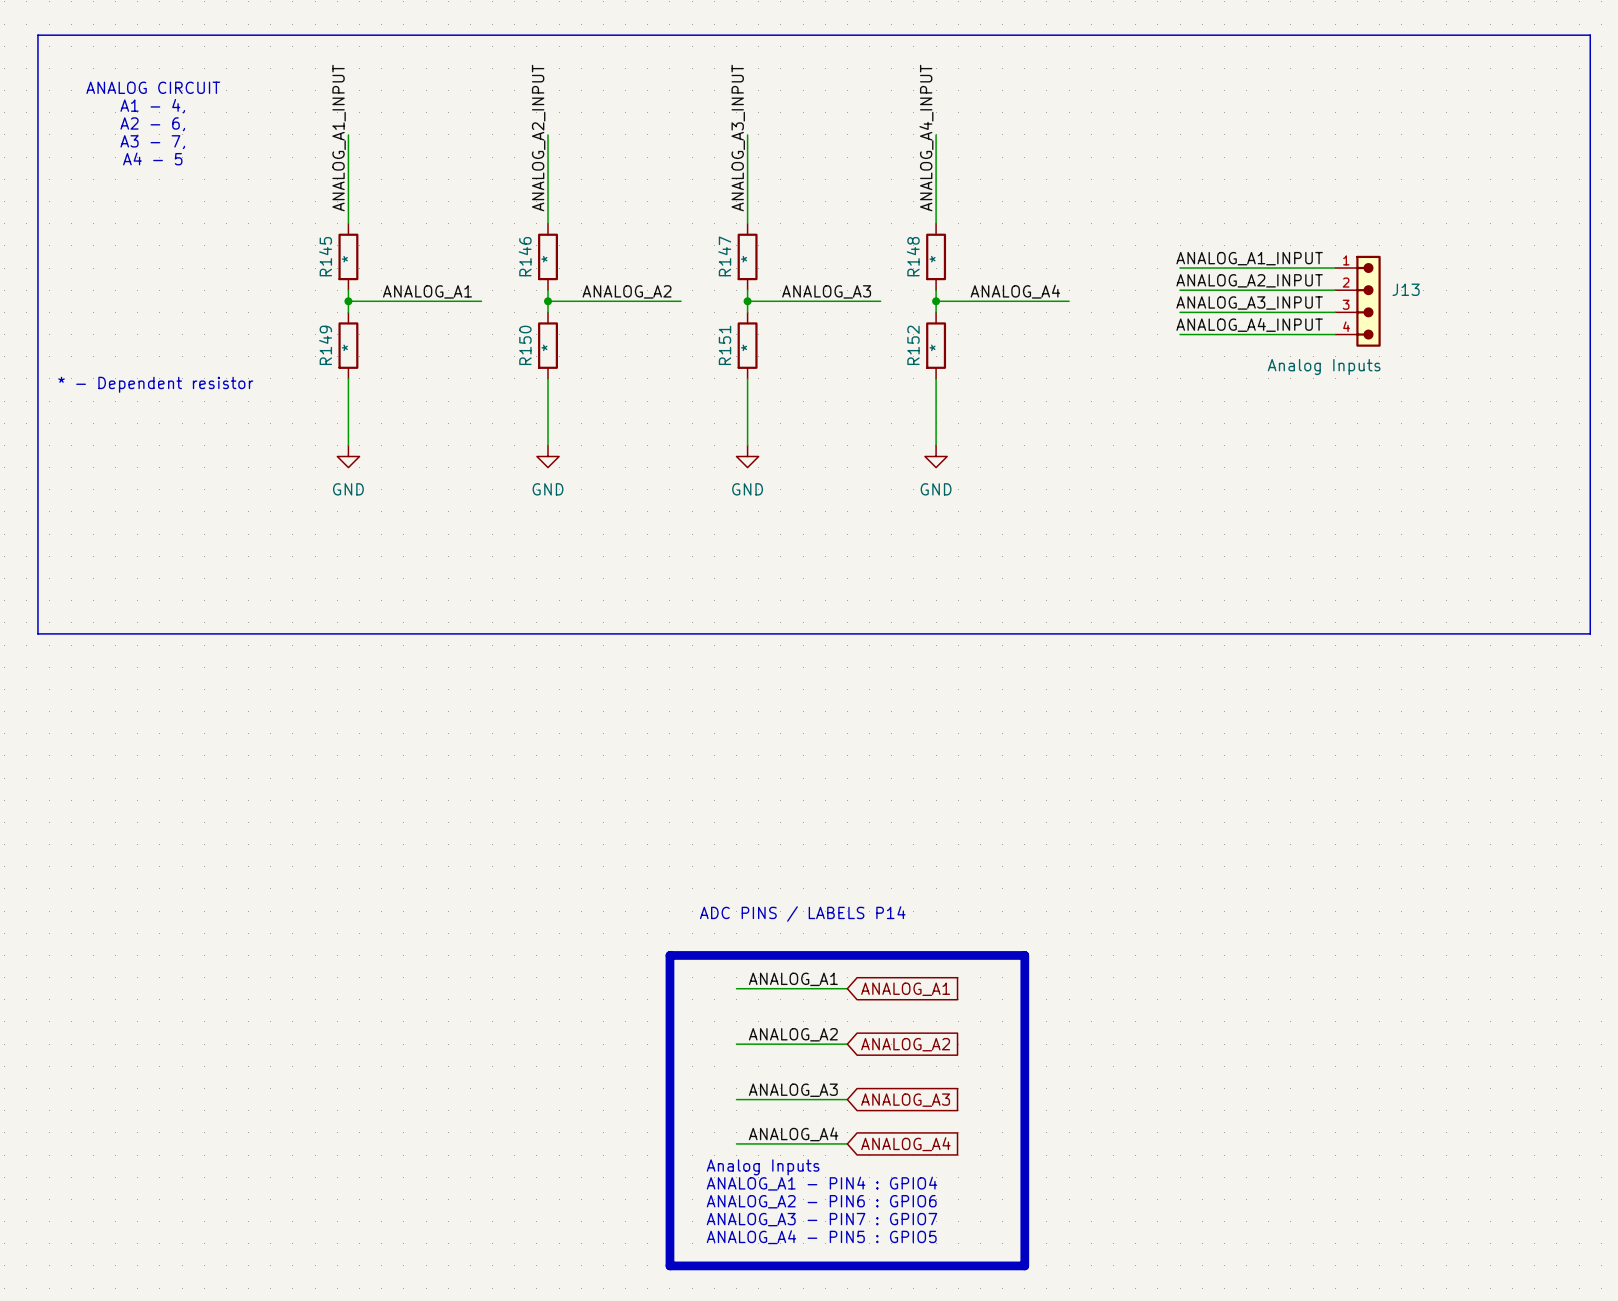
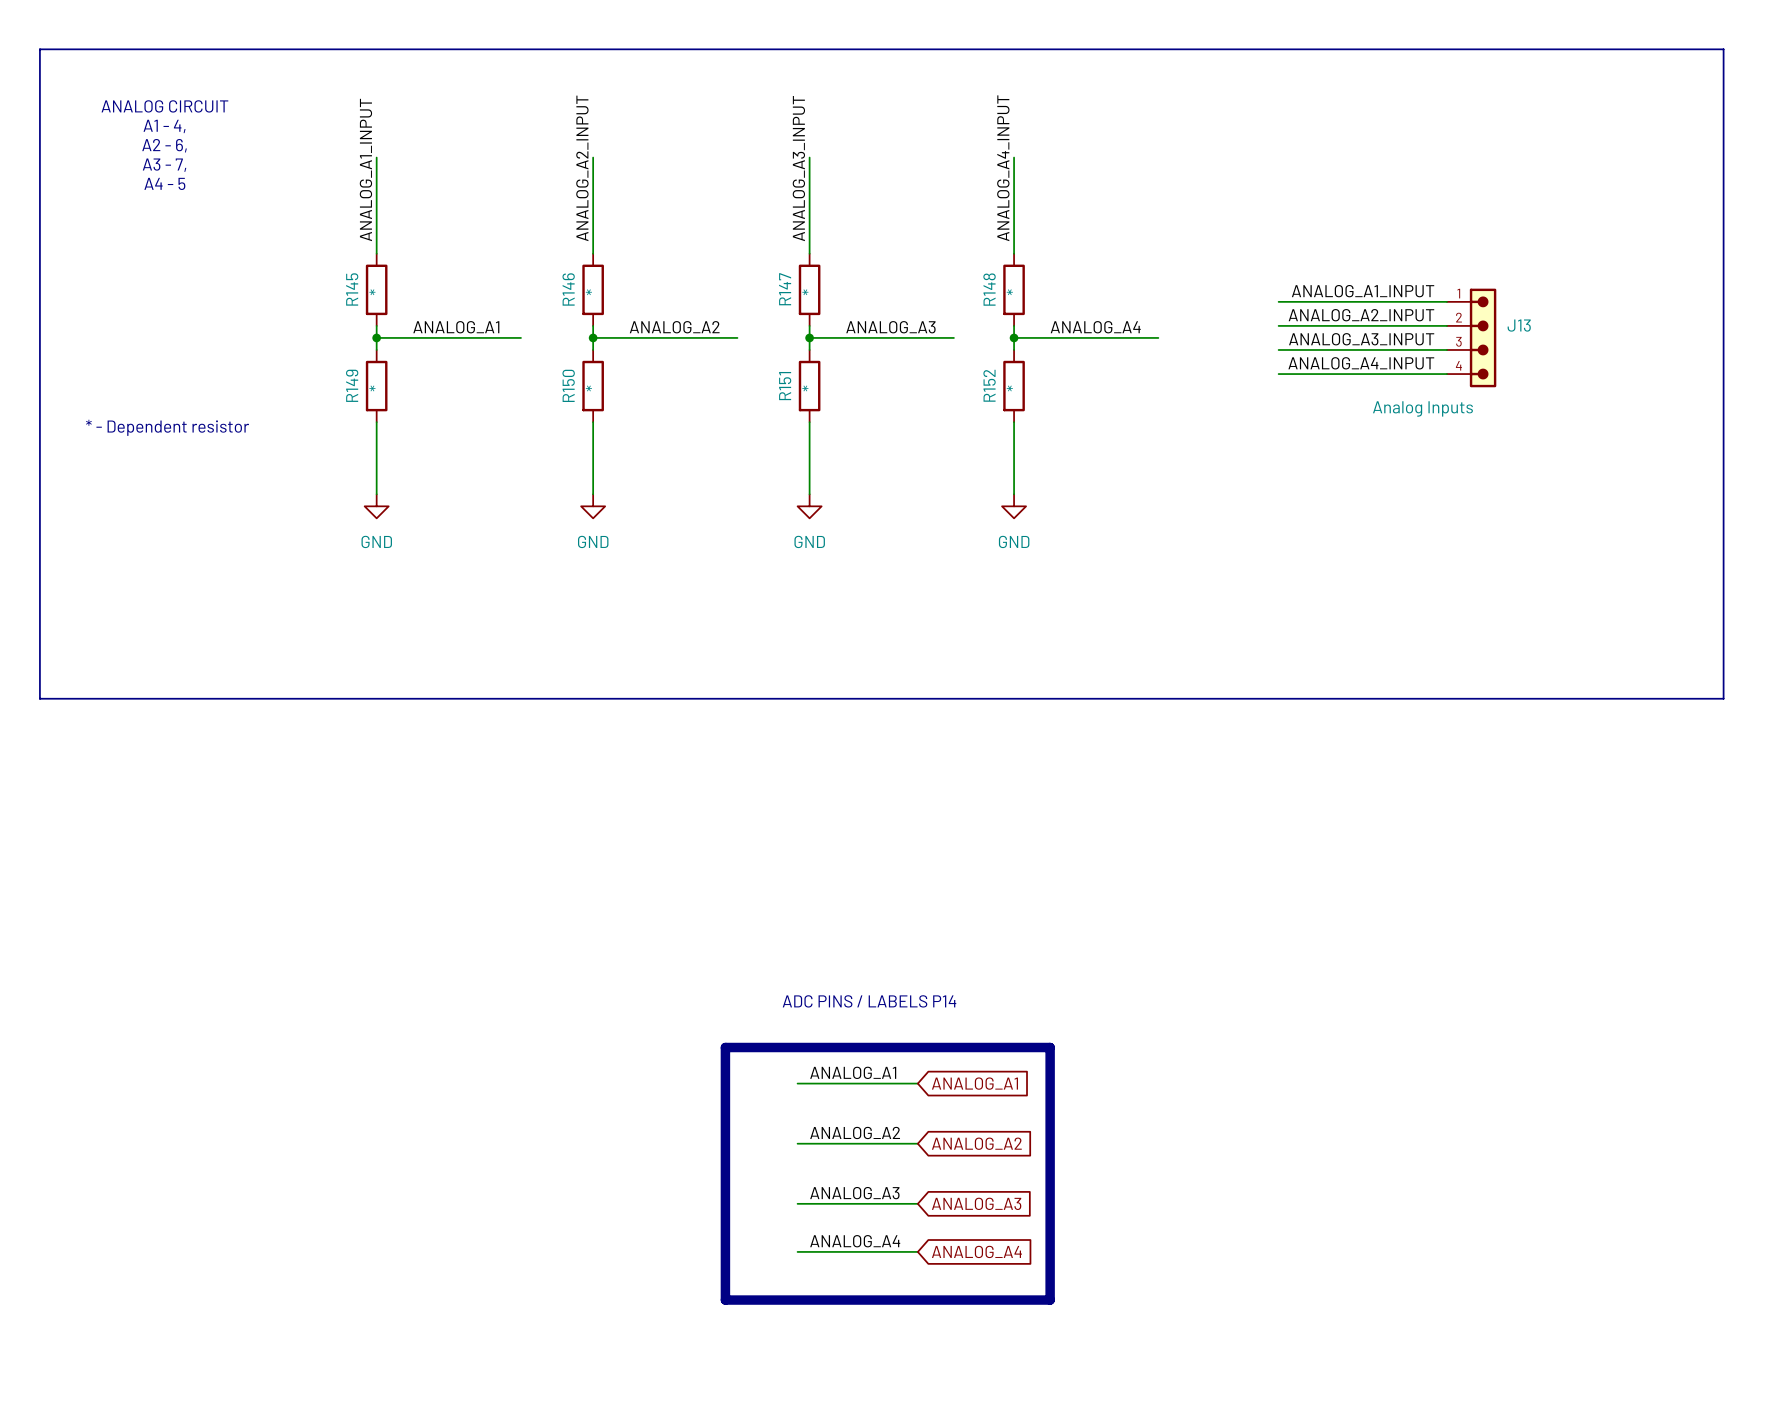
line: (969, 955) (1024, 955) (1024, 1265) (669, 1265) (669, 1188) -> (1050, 1047) (1050, 1300) (725, 1300)
text: Analog Inputs (763, 1167) -> none
text: ANALOG_A1 - PIN4 : GPIO4 (821, 1183) -> none
text: ANALOG_A2 - PIN6 : GPIO6 (821, 1201) -> none
text: ANALOG_A3 - PIN7 : GPIO7 (821, 1219) -> none
text: ANALOG_A4 - PIN5 : GPIO5 (821, 1237) -> none

